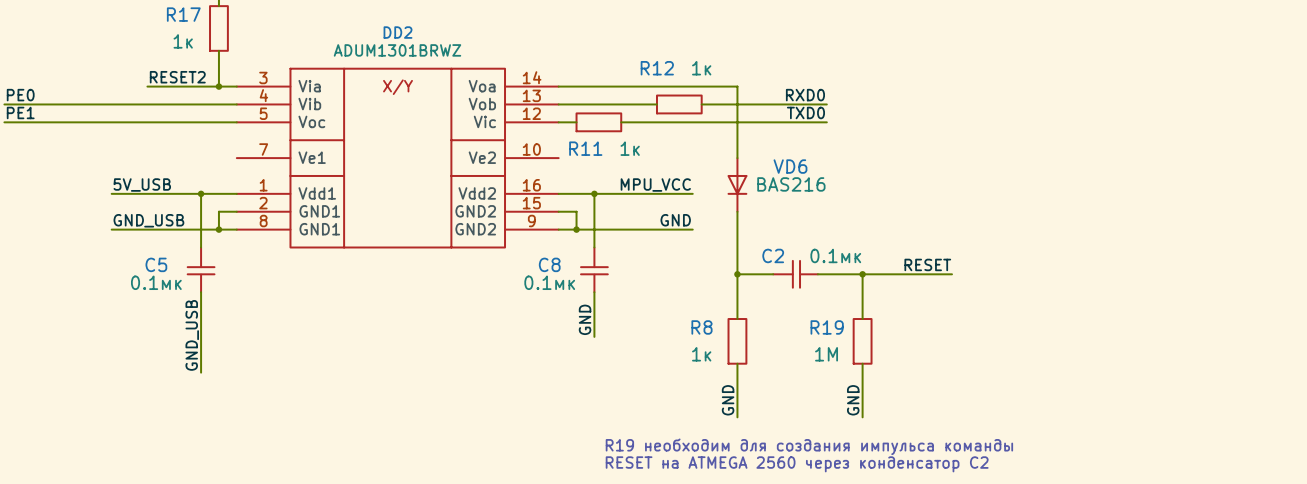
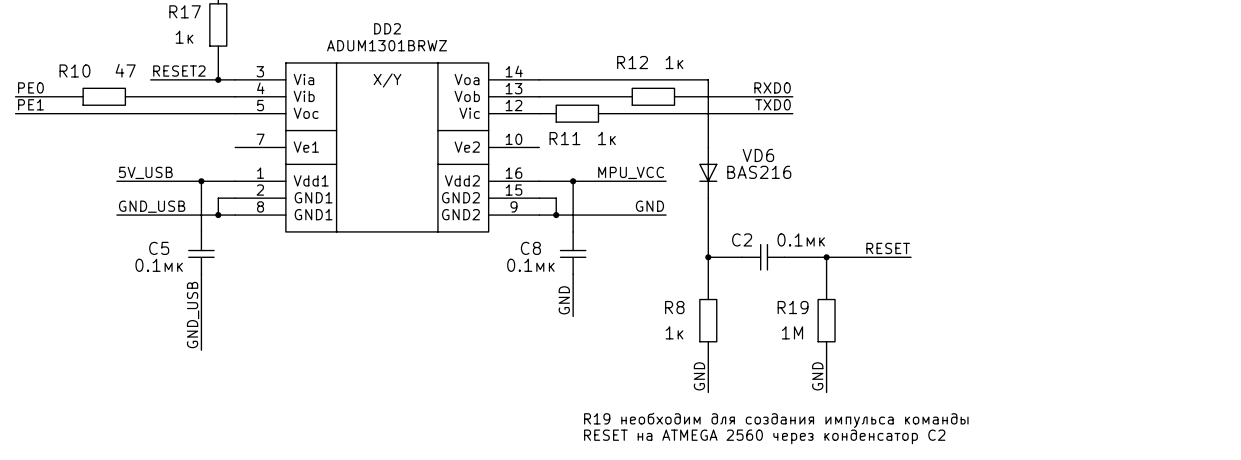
wire: (75, 104) (120, 104) -> none
R10: none -> 47 (104, 96)

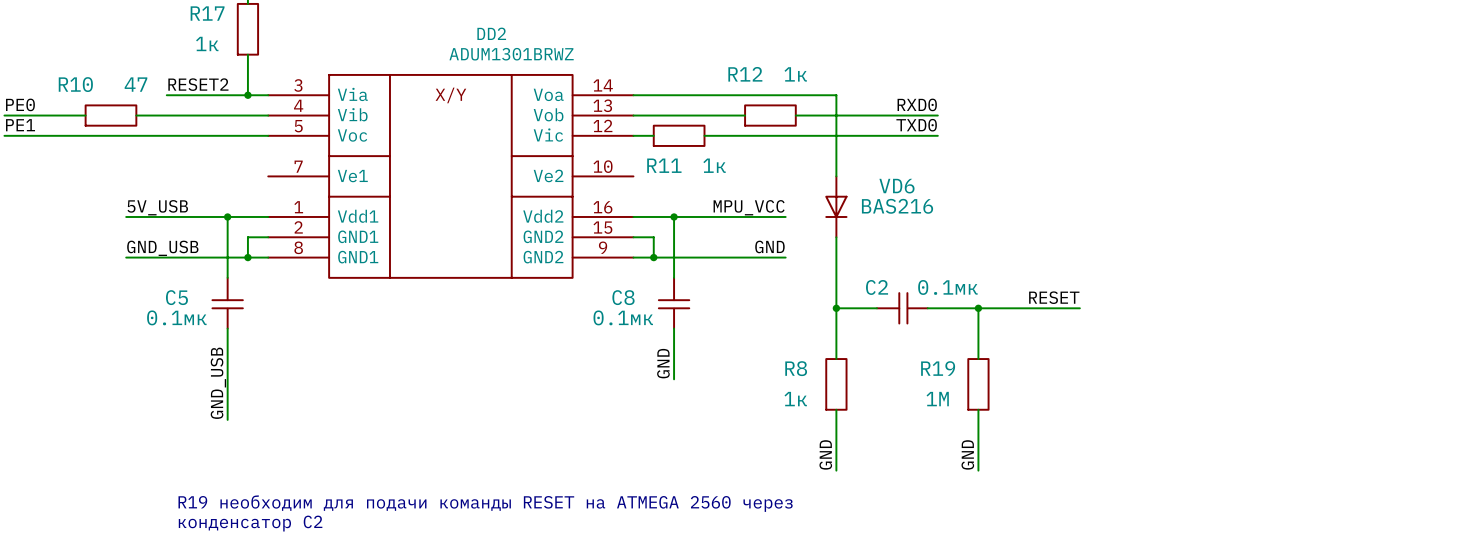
DD2 name position: DD2 (387, 28) -> DD2 (491, 33)
DD2 value position: ADUM1301BRWZ (387, 45) -> ADUM1301BRWZ (511, 54)
text: none -> R19 необходим для подачи команды RESET на ATMEGA 2560 через (485, 503)
text: R19 необходим для создания импульса команды (776, 420) -> none
text: none -> конденсатор С2 (250, 523)
text: RESET на ATMEGA 2560 через конденсатор С2 (764, 436) -> none

